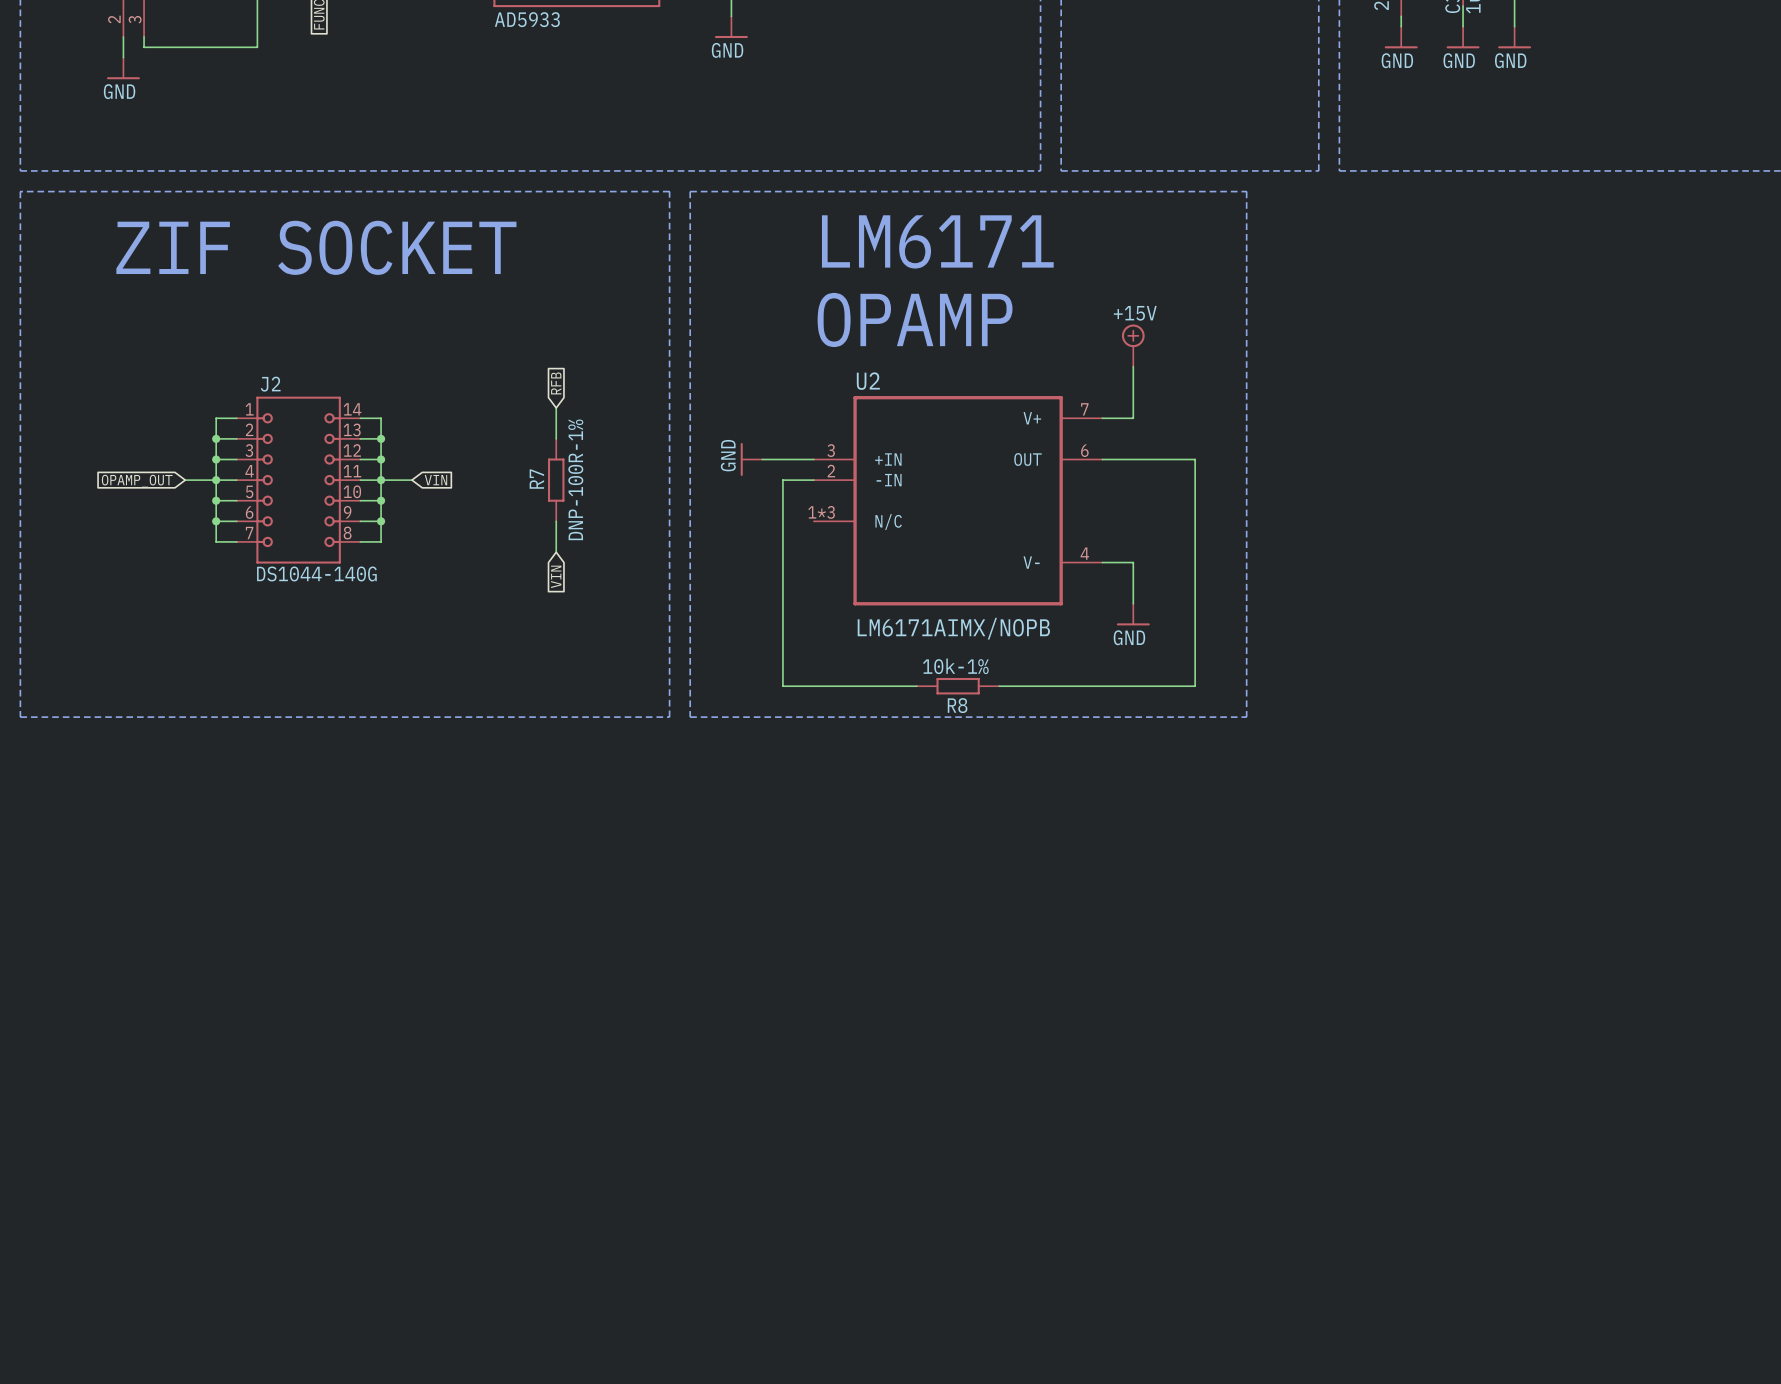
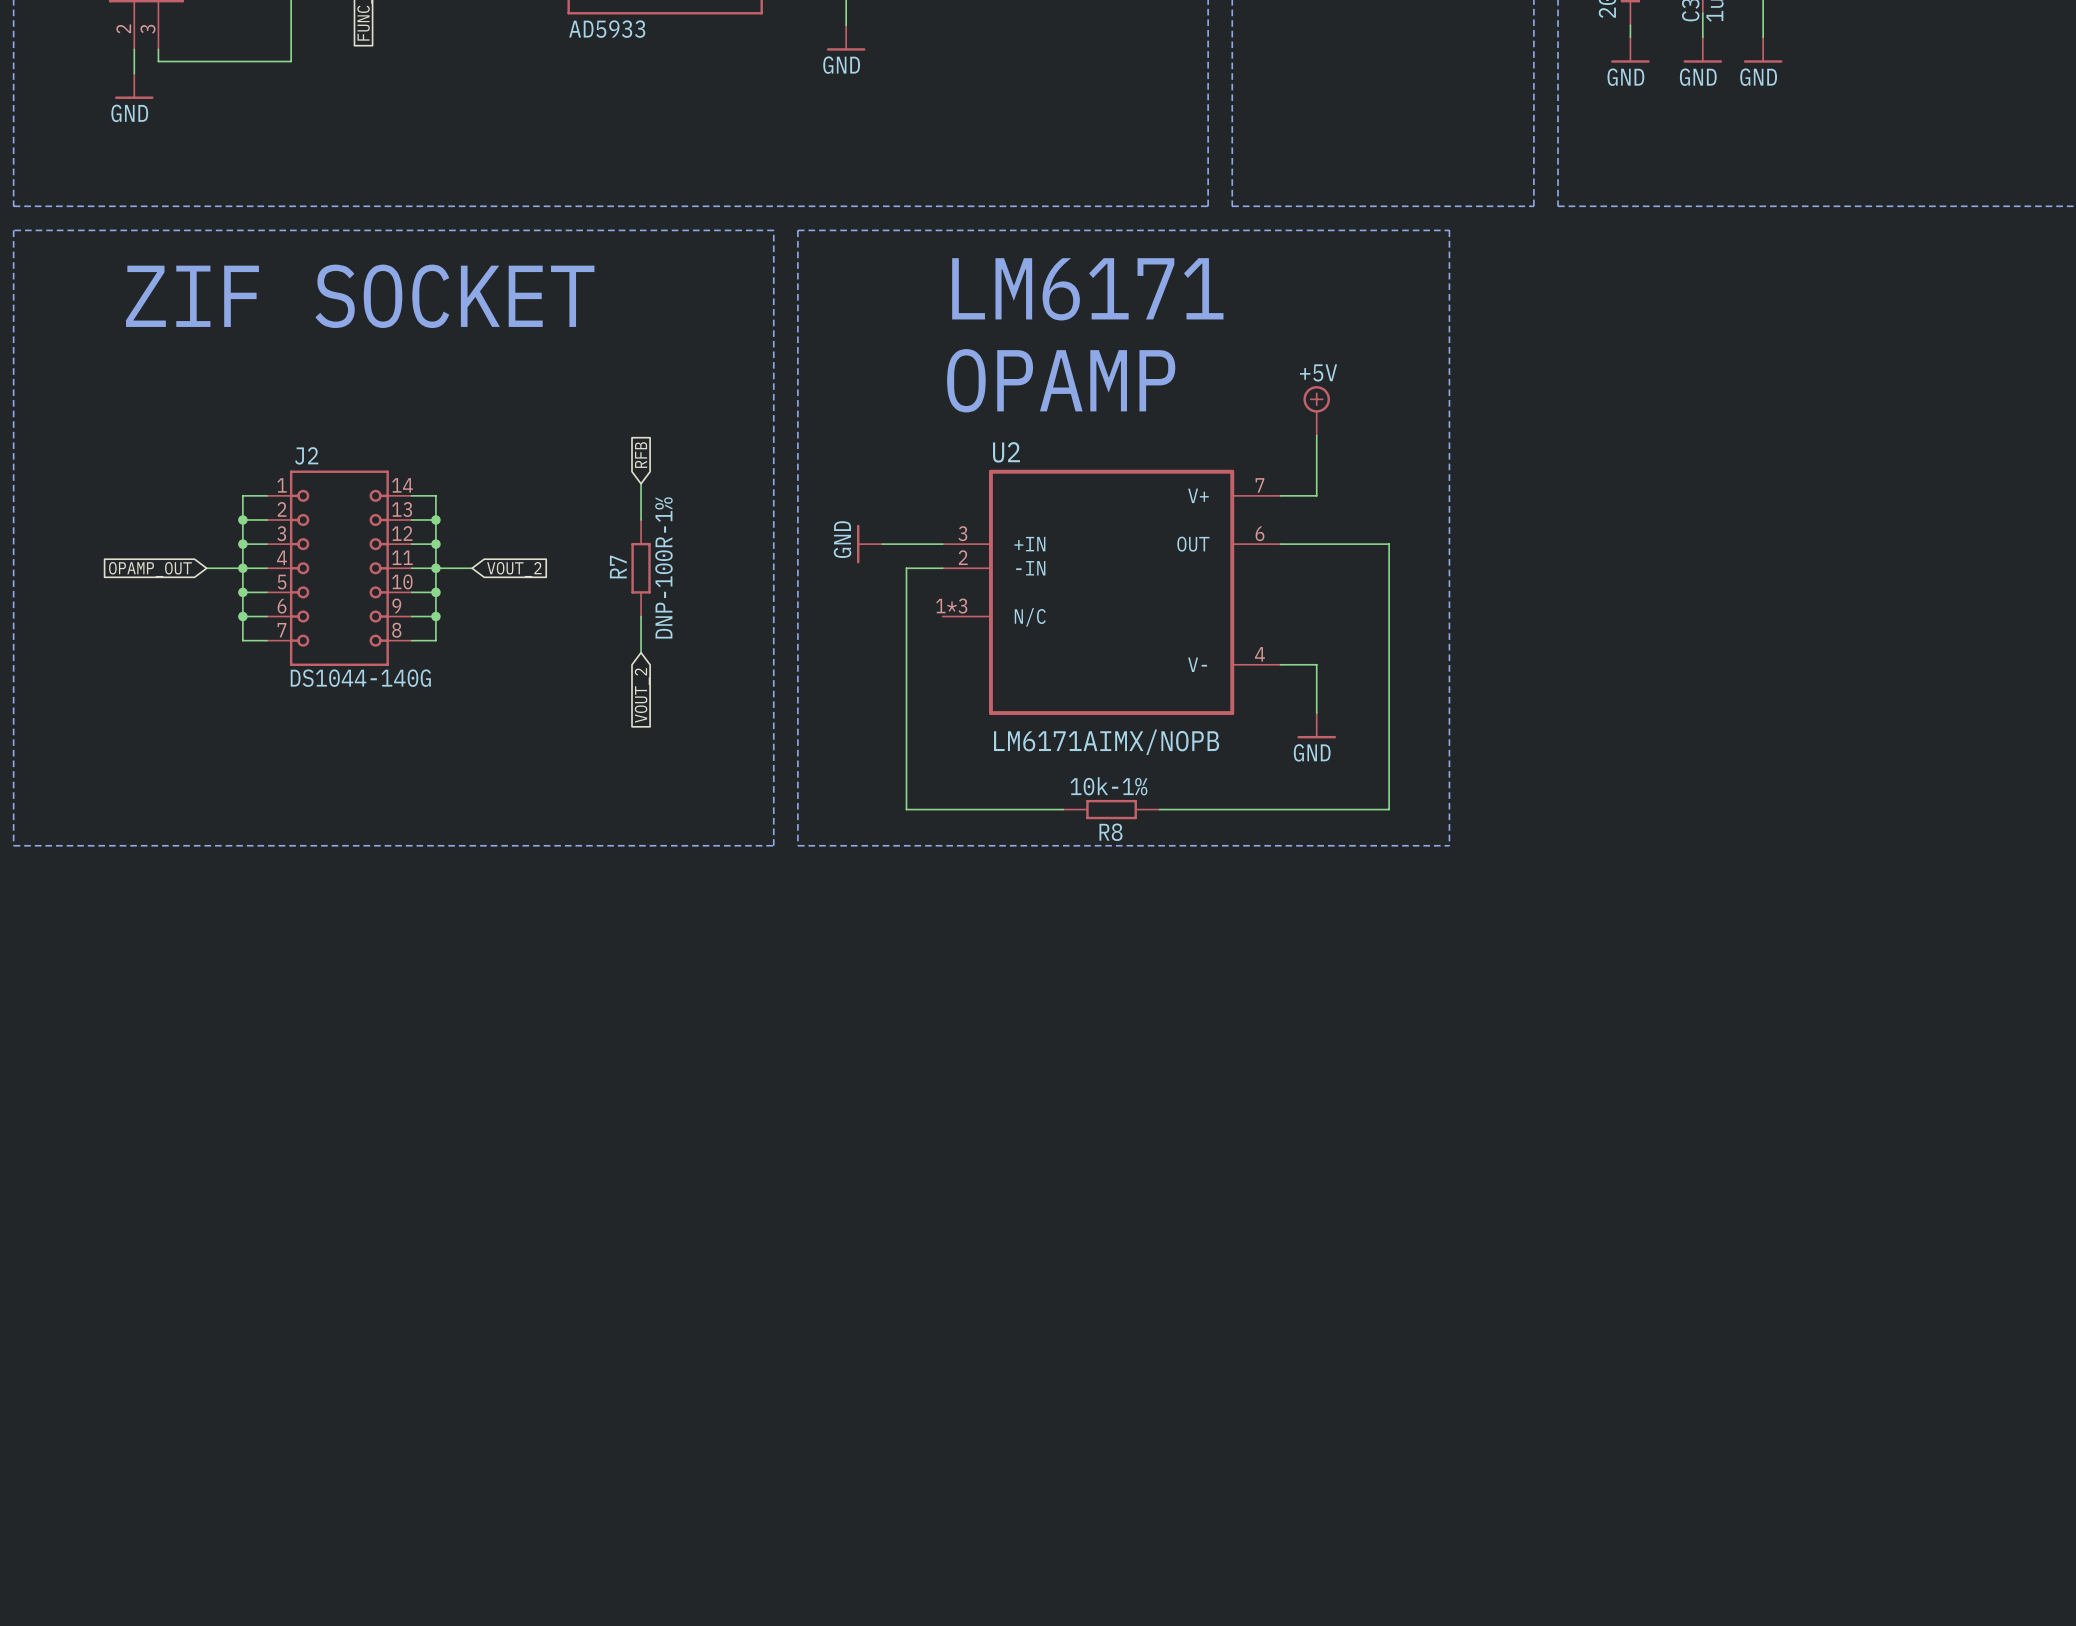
power symbol: +15V (1133, 345) -> +5V (1316, 410)
global label: VIN (436, 480) -> VOUT_2 (514, 569)
global label: VIN (556, 576) -> VOUT_2 (642, 695)

